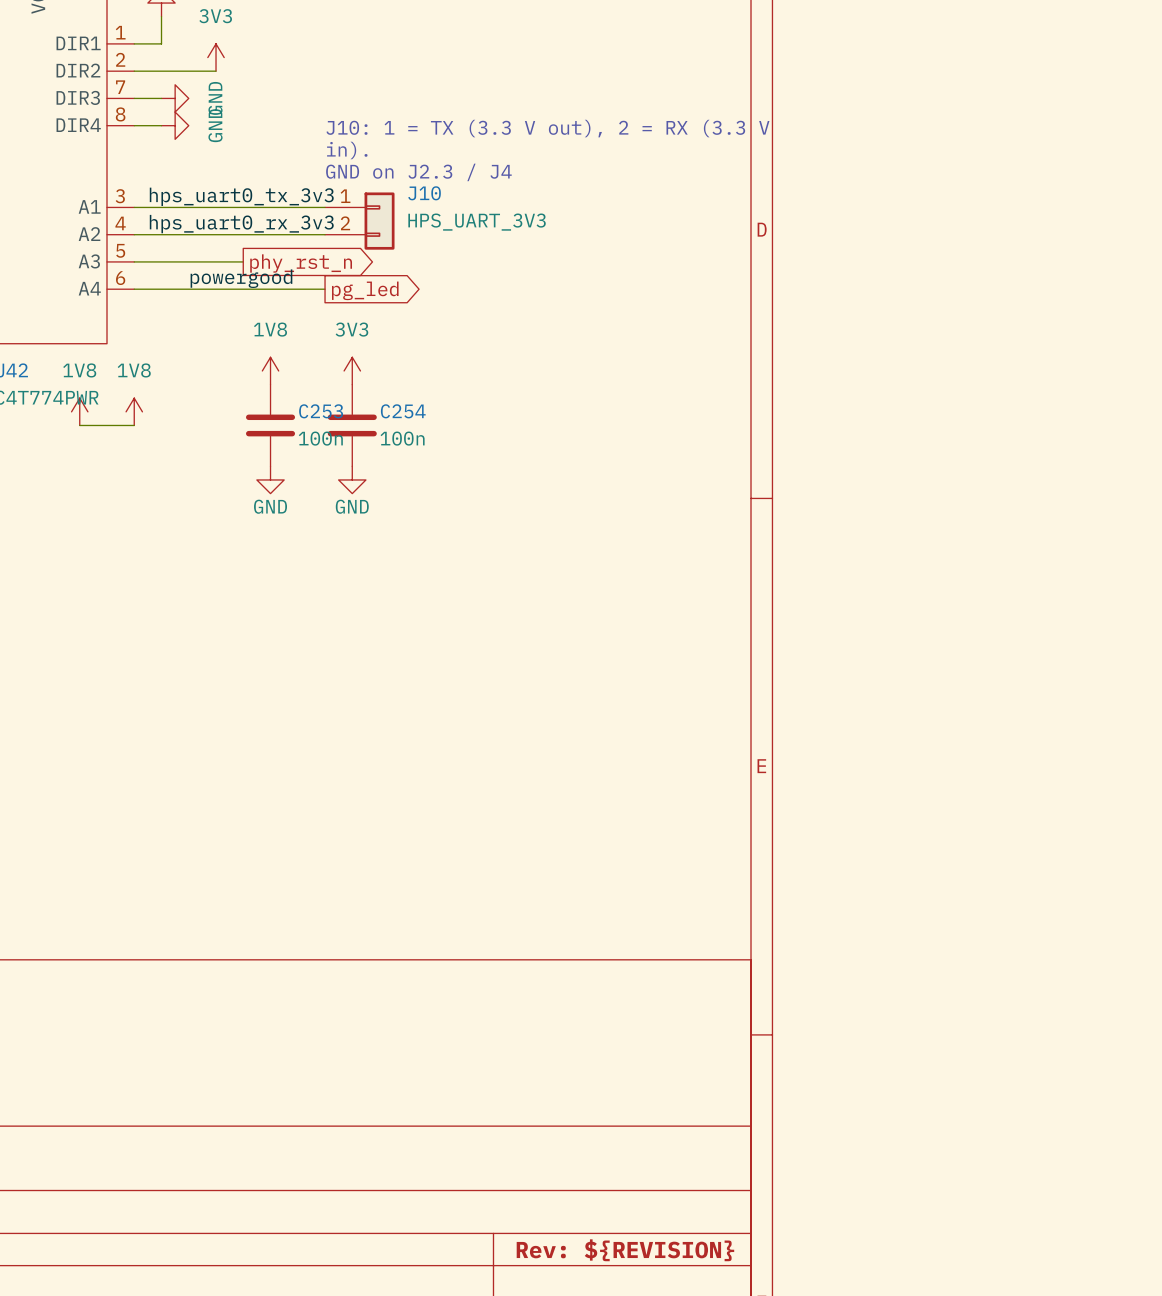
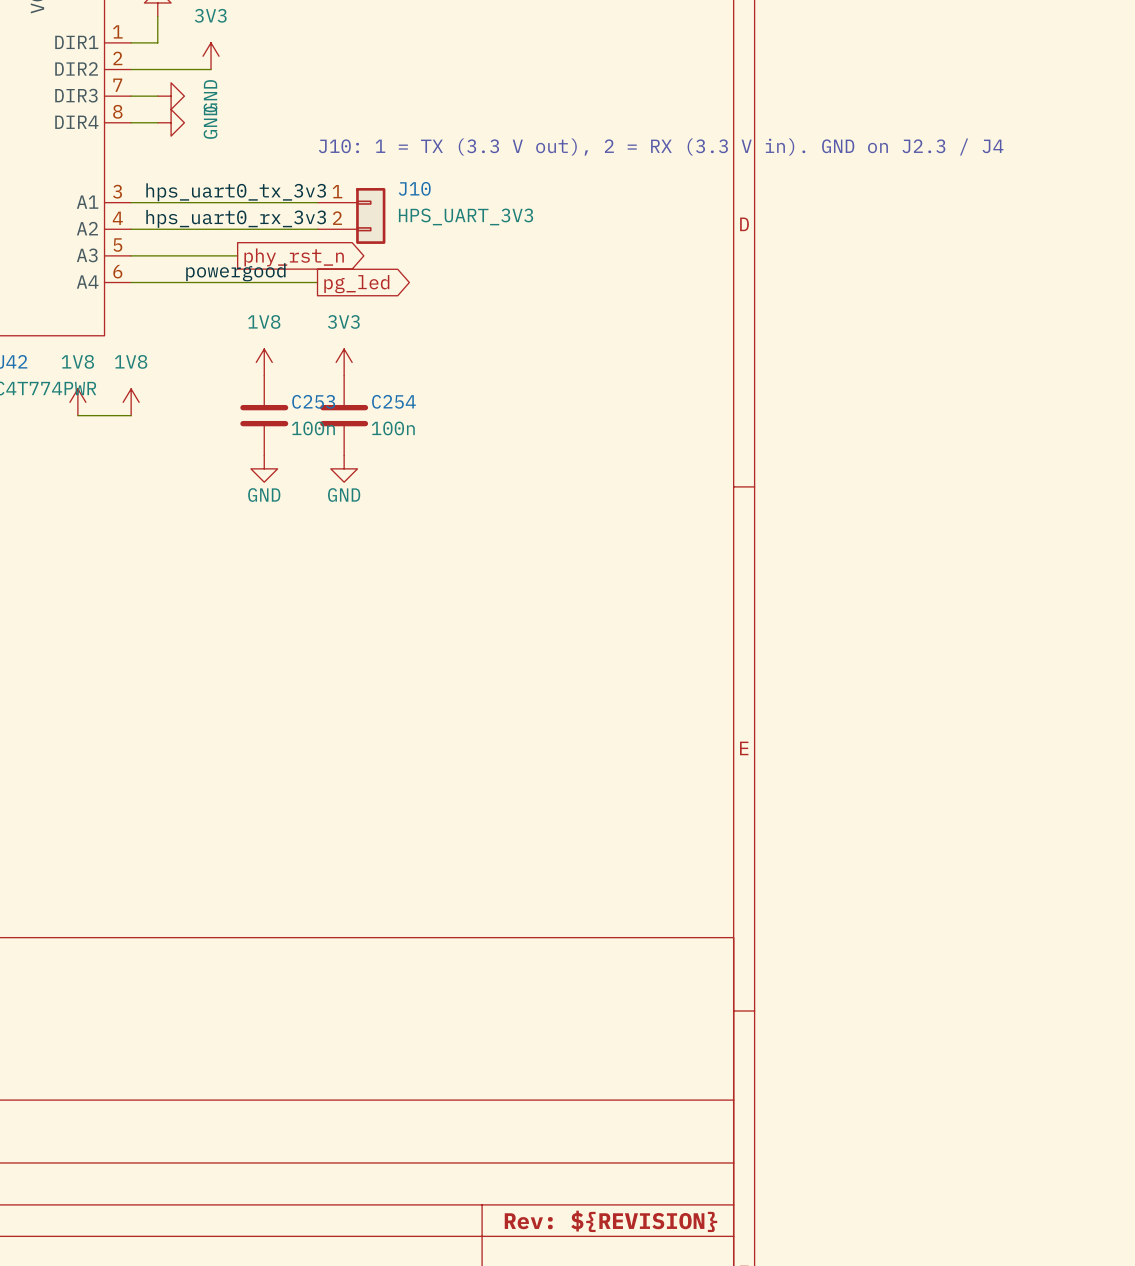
text: J10: 1 = TX (3.3 V out), 2 = RX (3.3 V (547, 128) -> none
text: in). (347, 150) -> J10: 1 = TX (3.3 V out), 2 = RX (3.3 V in). GND on J2.3 / J4 (661, 147)
text: GND on J2.3 / J4 (418, 172) -> none

